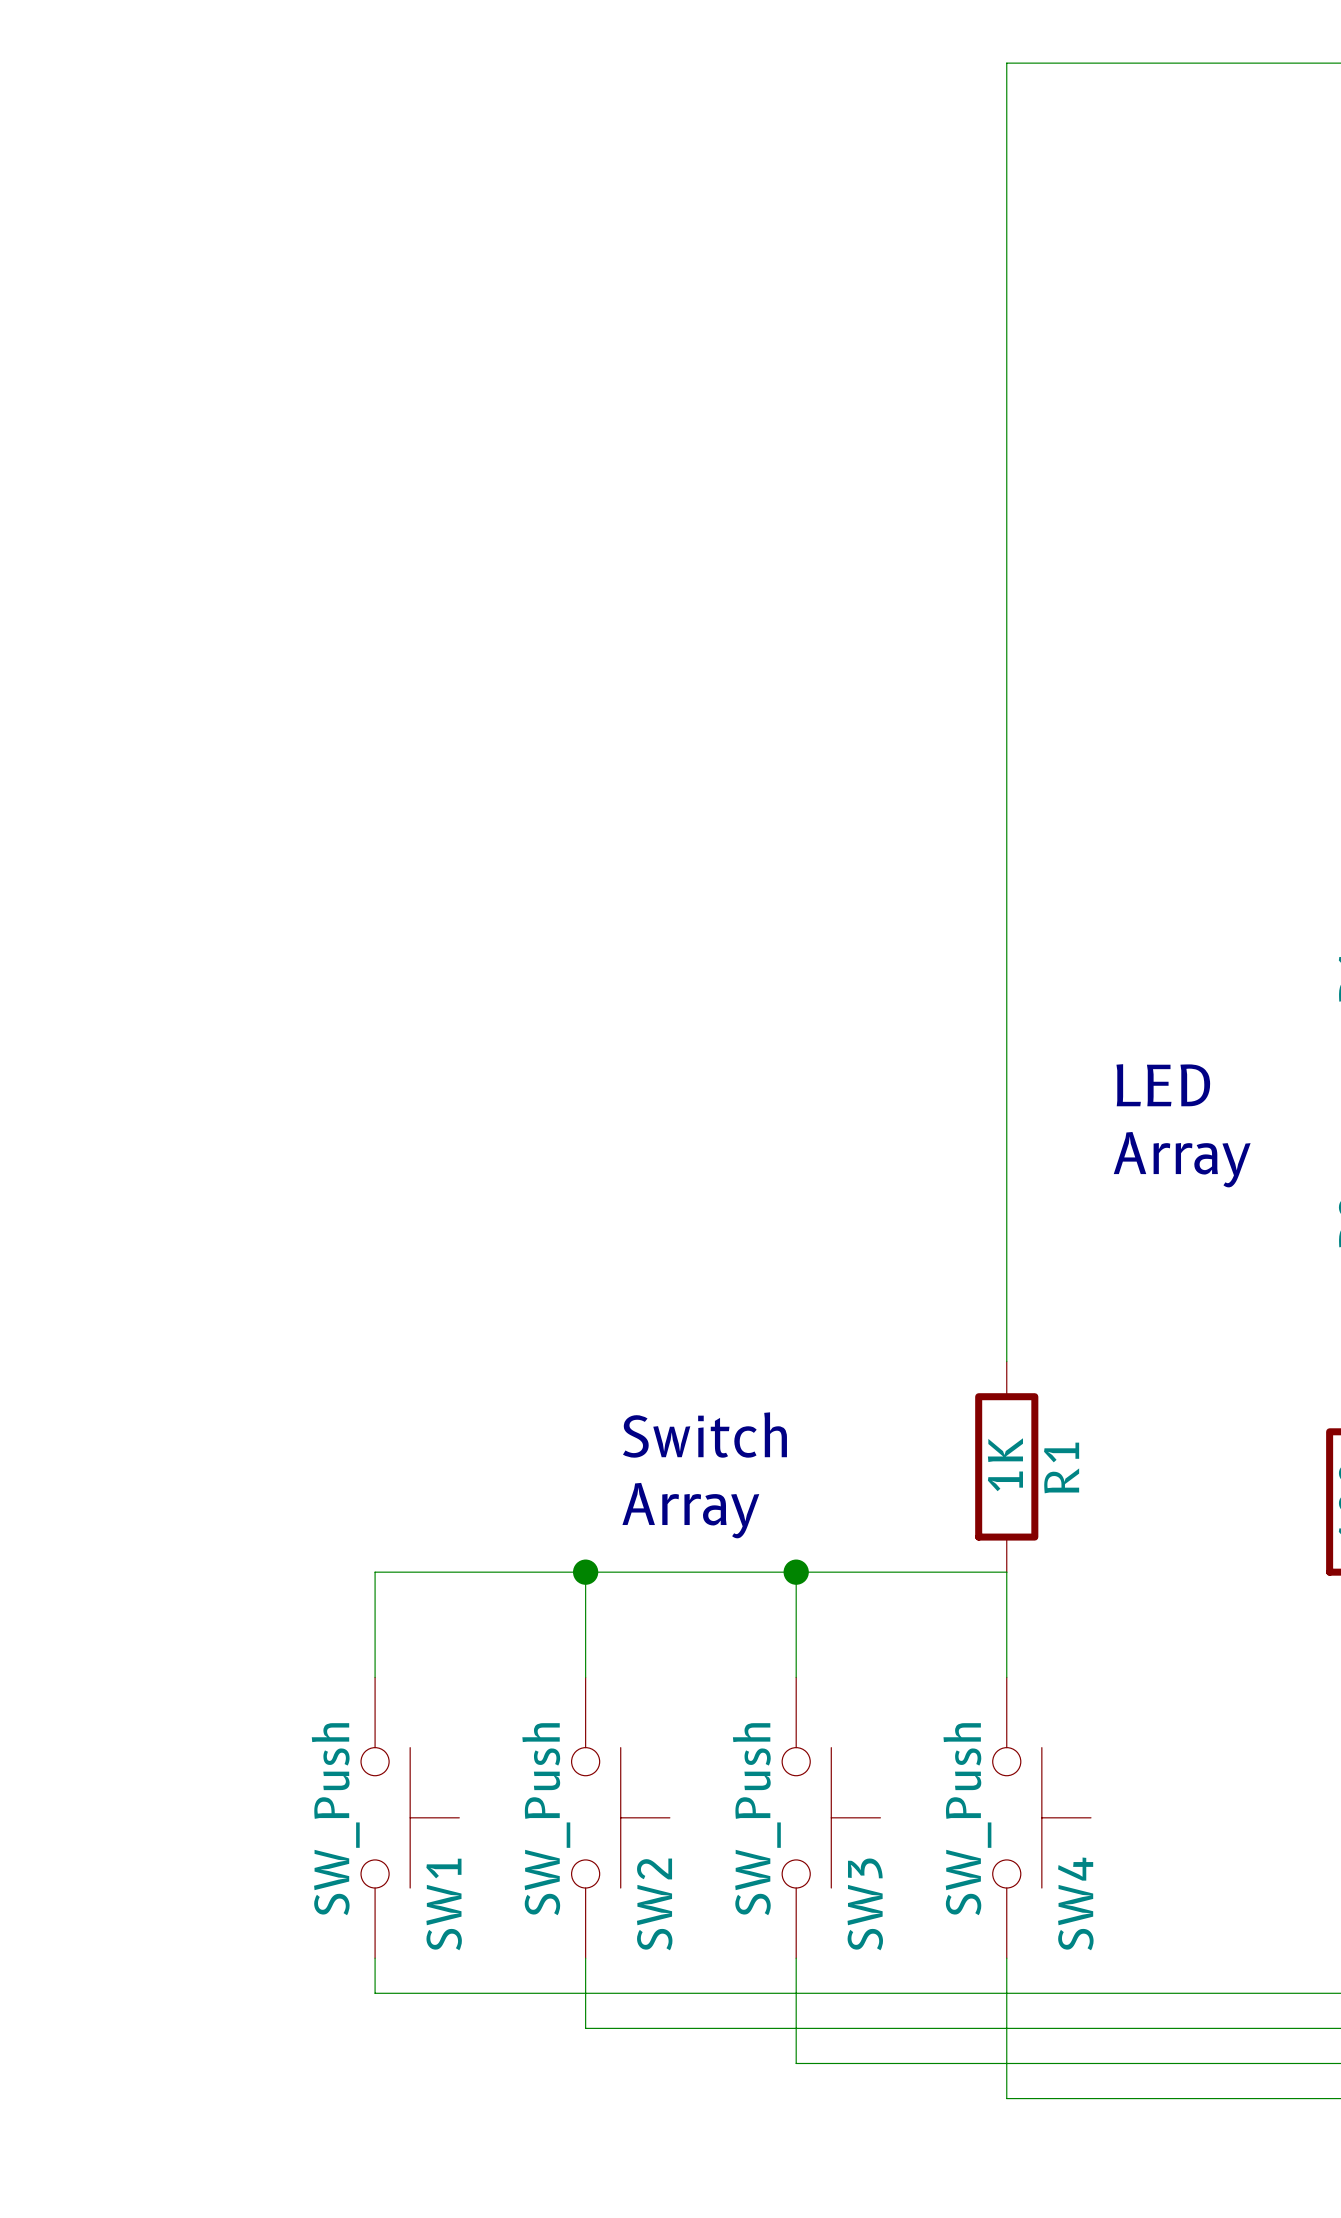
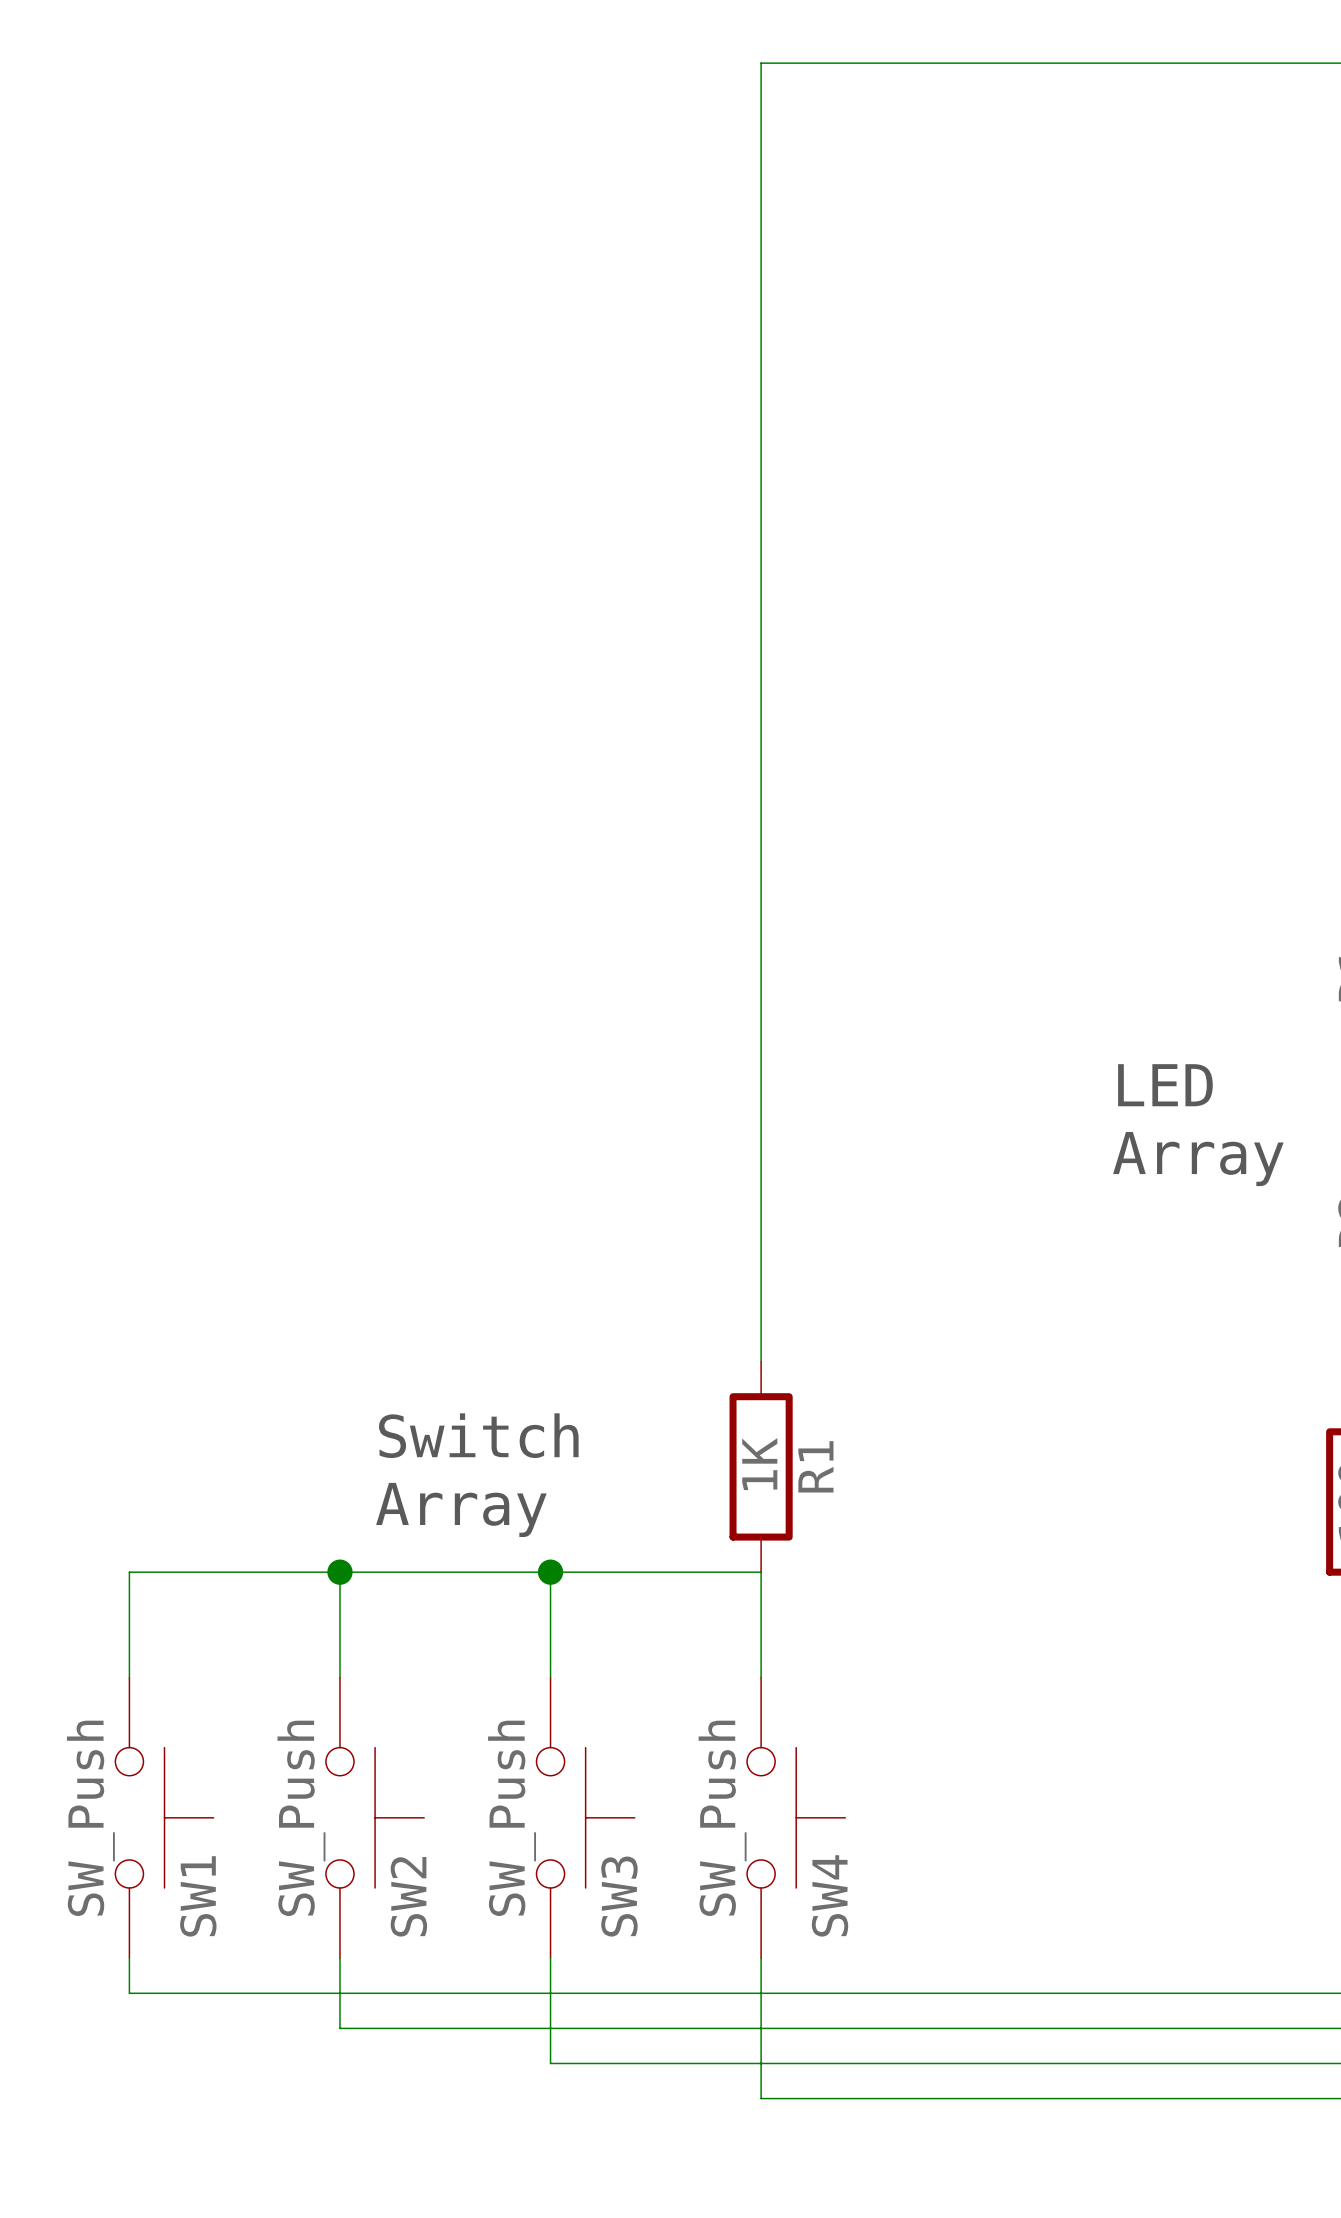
wire: (1006, 63) (1006, 1361) -> (1006, 63) (761, 63) (761, 1361)
text position: Switch (704, 1435) -> Switch (478, 1435)
R1 position: (1006, 1466) -> (761, 1466)
text position: Array (690, 1510) -> Array (461, 1509)
junction: none -> (339, 1572)
wire: (375, 1572) (375, 1677) -> (375, 1572) (129, 1572) (129, 1677)
wire: (585, 1572) (585, 1677) -> (550, 1572) (550, 1677)
junction position: (585, 1572) -> (550, 1572)
wire: (761, 1572) (1006, 1572) (1006, 1677) -> (761, 1572) (761, 1677)
wire: (796, 1572) (796, 1677) -> (339, 1572) (339, 1677)
junction: (796, 1572) -> none
SW1 position: (410, 1817) -> (164, 1817)
SW2 position: (620, 1817) -> (375, 1817)
SW3 position: (831, 1817) -> (585, 1817)
SW4 position: (1041, 1817) -> (796, 1817)
wire: (375, 1958) (375, 1993) -> (129, 1958) (129, 1993) (375, 1993)
wire: (585, 1958) (585, 2028) -> (339, 1958) (339, 2028) (585, 2028)
wire: (796, 1958) (796, 2063) -> (550, 1958) (550, 2063) (796, 2063)
wire: (1006, 1958) (1006, 2098) -> (761, 1958) (761, 2098) (1006, 2098)

